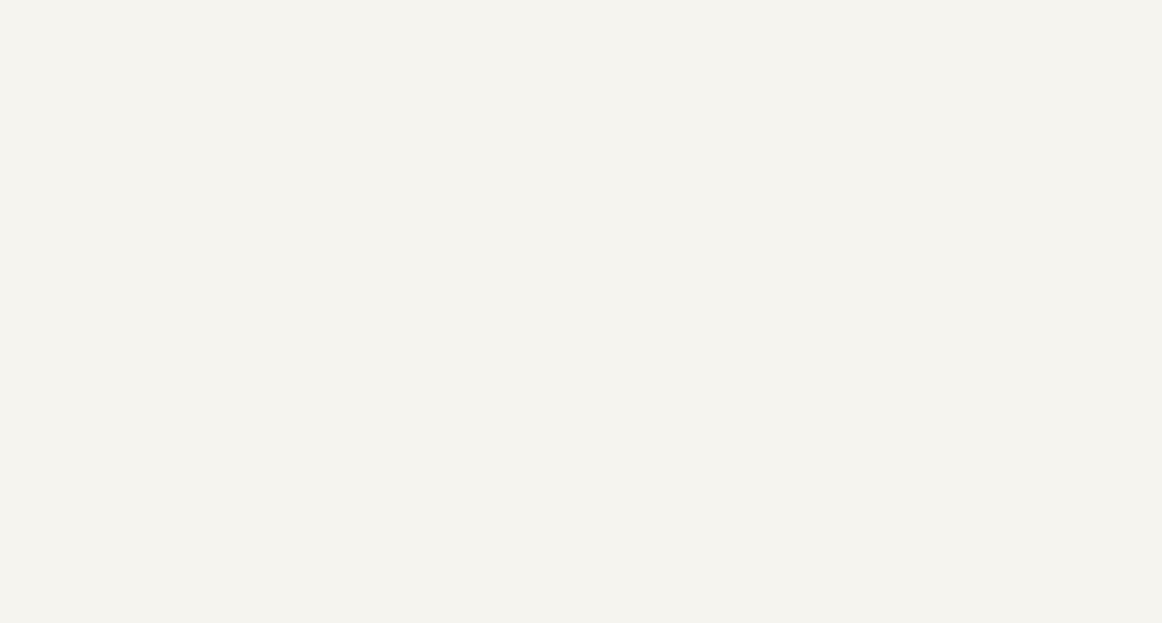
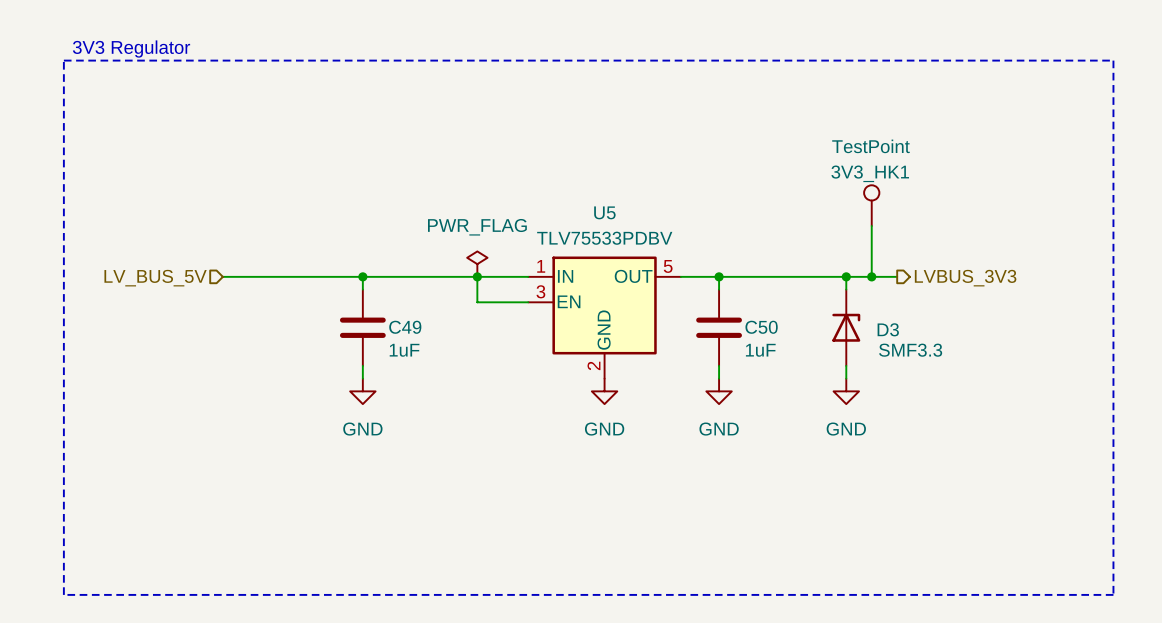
text: none -> 3V3 Regulator (131, 49)
line: none -> (63, 60) (1113, 60) (1113, 594) (63, 594) (63, 60)
3V3_HK1: none -> TestPoint (871, 205)
wire: none -> (871, 225) (871, 276)
power symbol: none -> PWR_FLAG (477, 264)
wire: none -> (222, 276) (528, 276)
wire: none -> (362, 276) (362, 289)
junction: none -> (362, 276)
wire: none -> (477, 276) (477, 302) (528, 302)
junction: none -> (477, 276)
wire: none -> (680, 276) (897, 276)
wire: none -> (719, 276) (719, 289)
junction: none -> (719, 276)
wire: none -> (846, 276) (846, 289)
junction: none -> (846, 276)
junction: none -> (871, 276)
hierarchical label: none -> LV_BUS_5V (155, 278)
hierarchical label: none -> LVBUS_3V3 (965, 278)
U5: none -> TLV75533PDBV (604, 317)
C49: none -> 1uF (362, 327)
C50: none -> 1uF (719, 327)
D3: none -> SMF3.3 (846, 327)
wire: none -> (362, 365) (362, 378)
wire: none -> (719, 365) (719, 378)
wire: none -> (846, 365) (846, 378)
power symbol: none -> GND (362, 391)
power symbol: none -> GND (604, 391)
power symbol: none -> GND (719, 391)
power symbol: none -> GND (846, 391)

